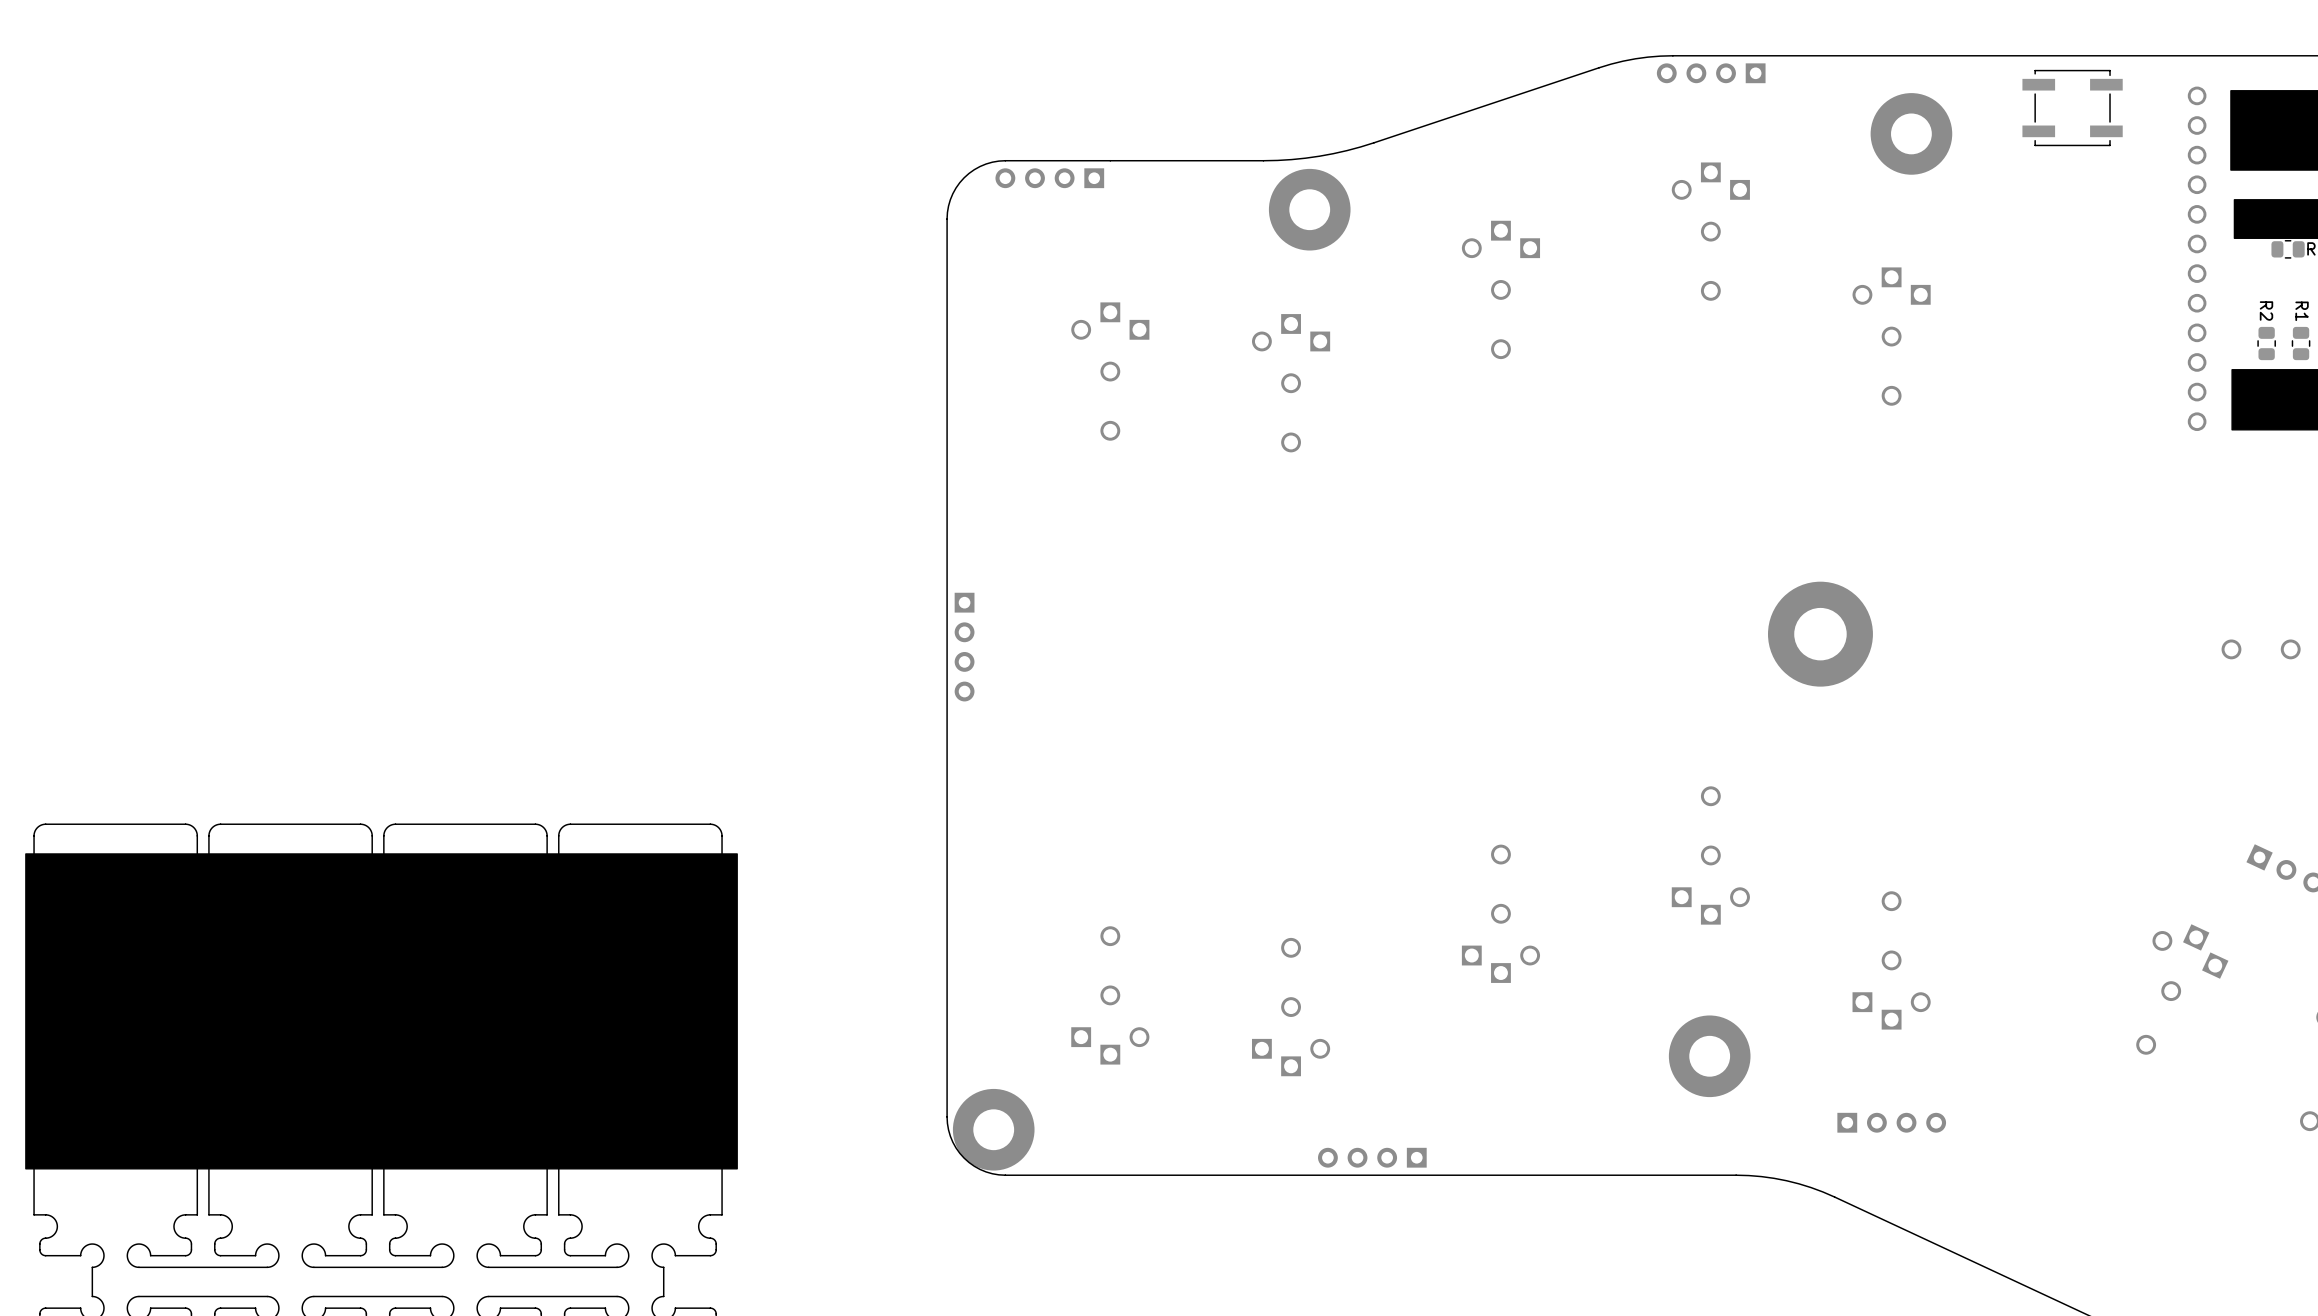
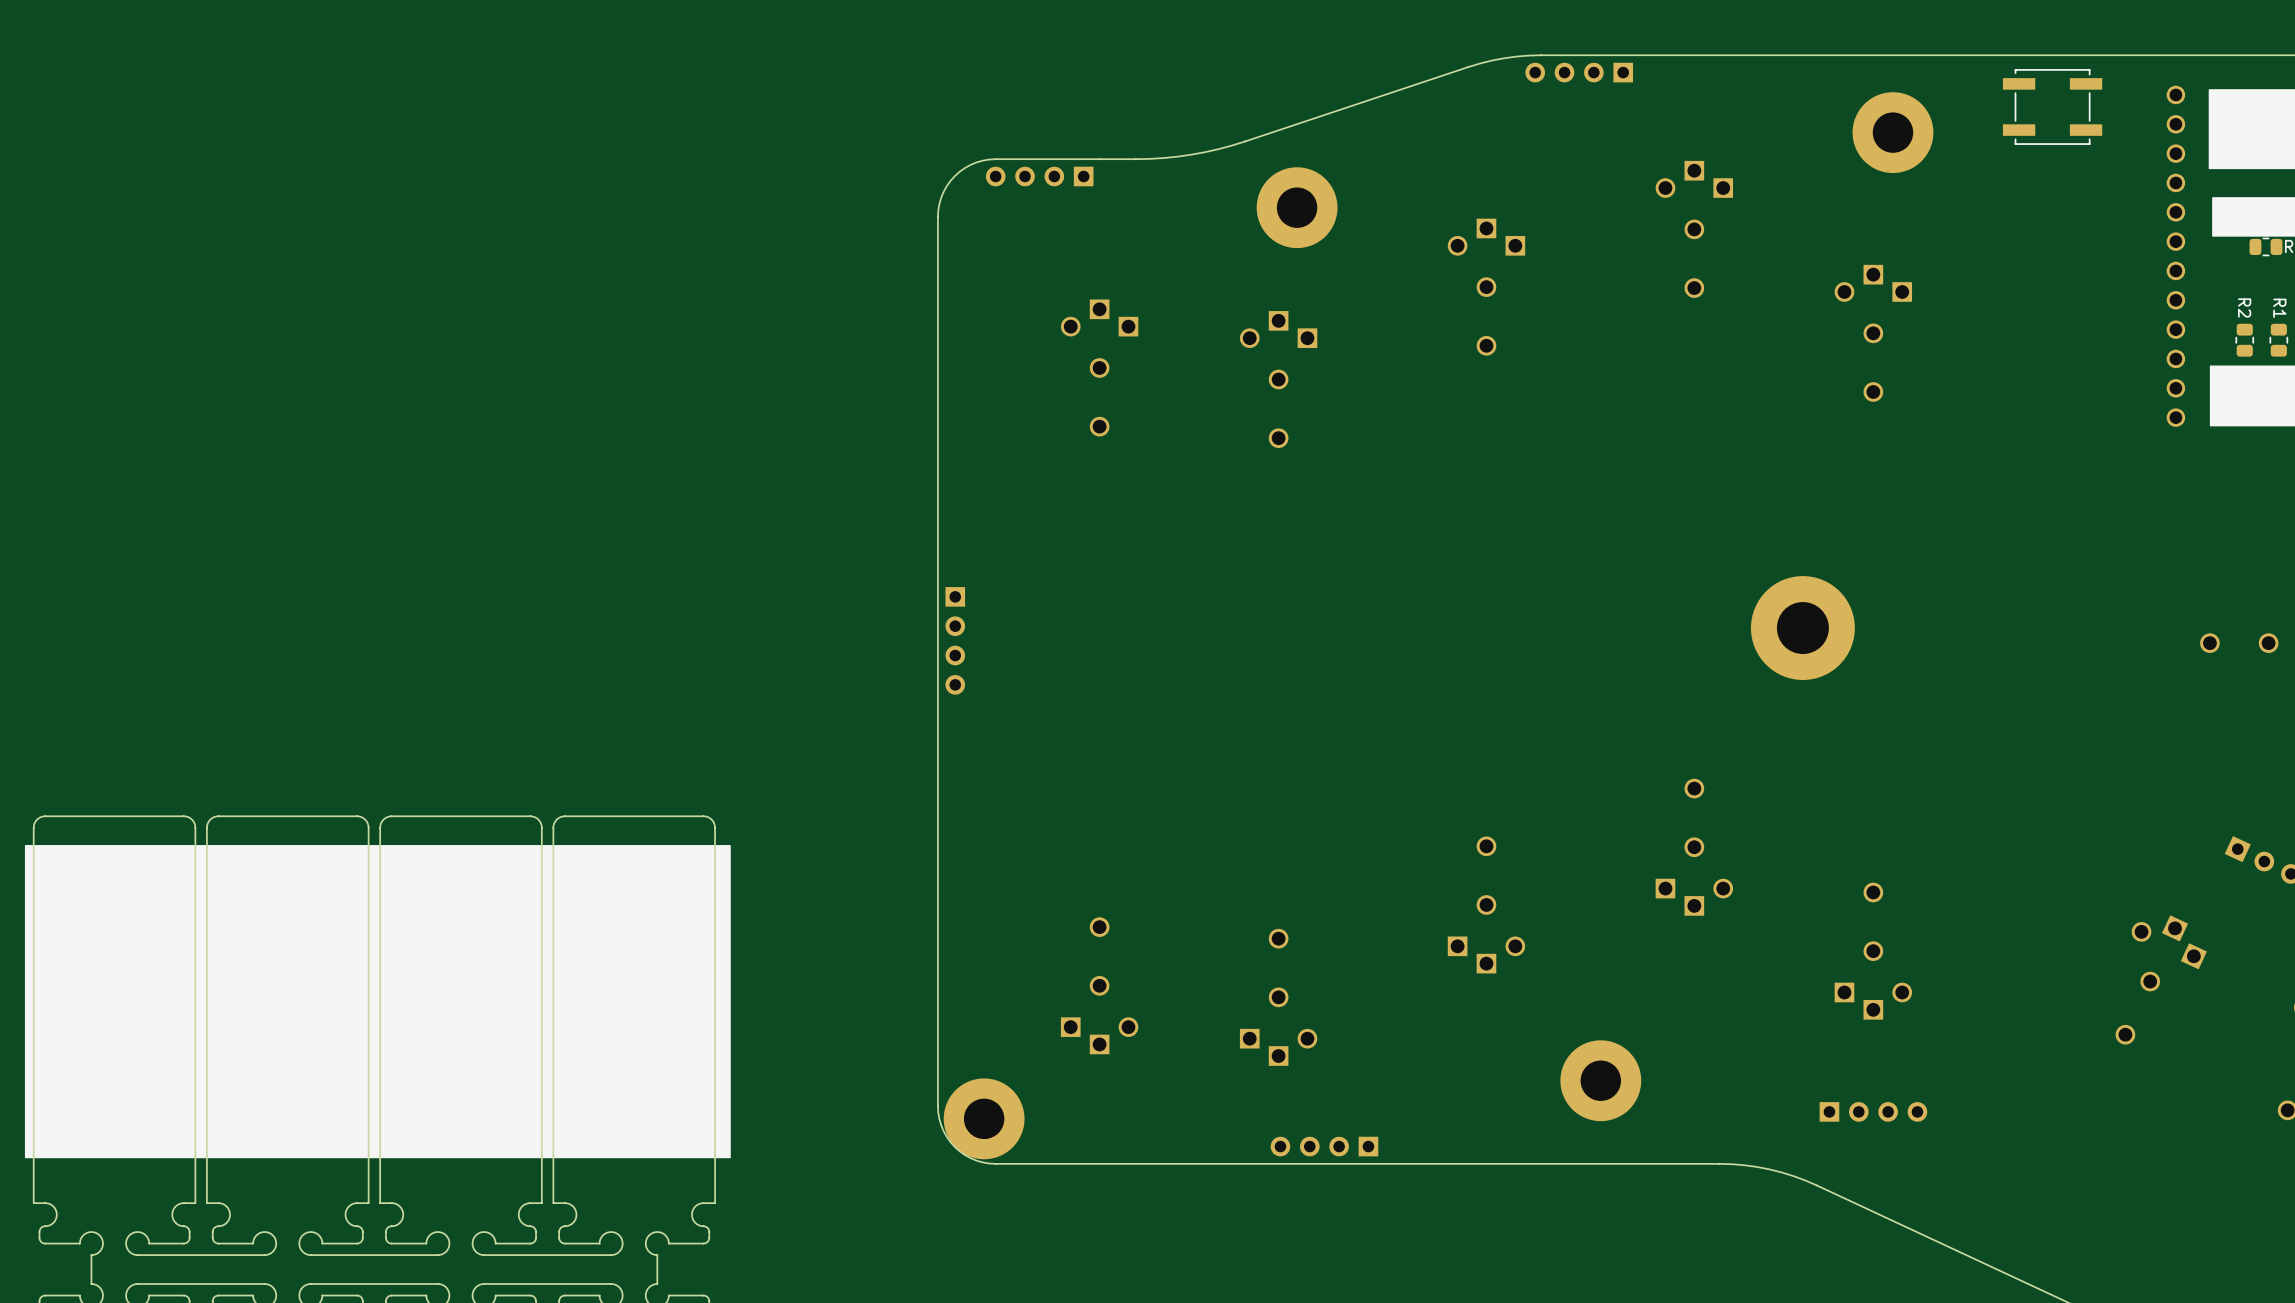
board edge: (1672, 55) (1647, 57) (1611, 64) (1374, 142) (1333, 153) (1277, 160) (1146, 160) -> (1656, 55) (1528, 55) (1492, 60) (1232, 145) (1177, 156) (1135, 159)
part position: (1711, 73) -> (1579, 72)
part position: (1709, 1056) -> (1600, 1080)
part position: (1372, 1157) -> (1324, 1146)

